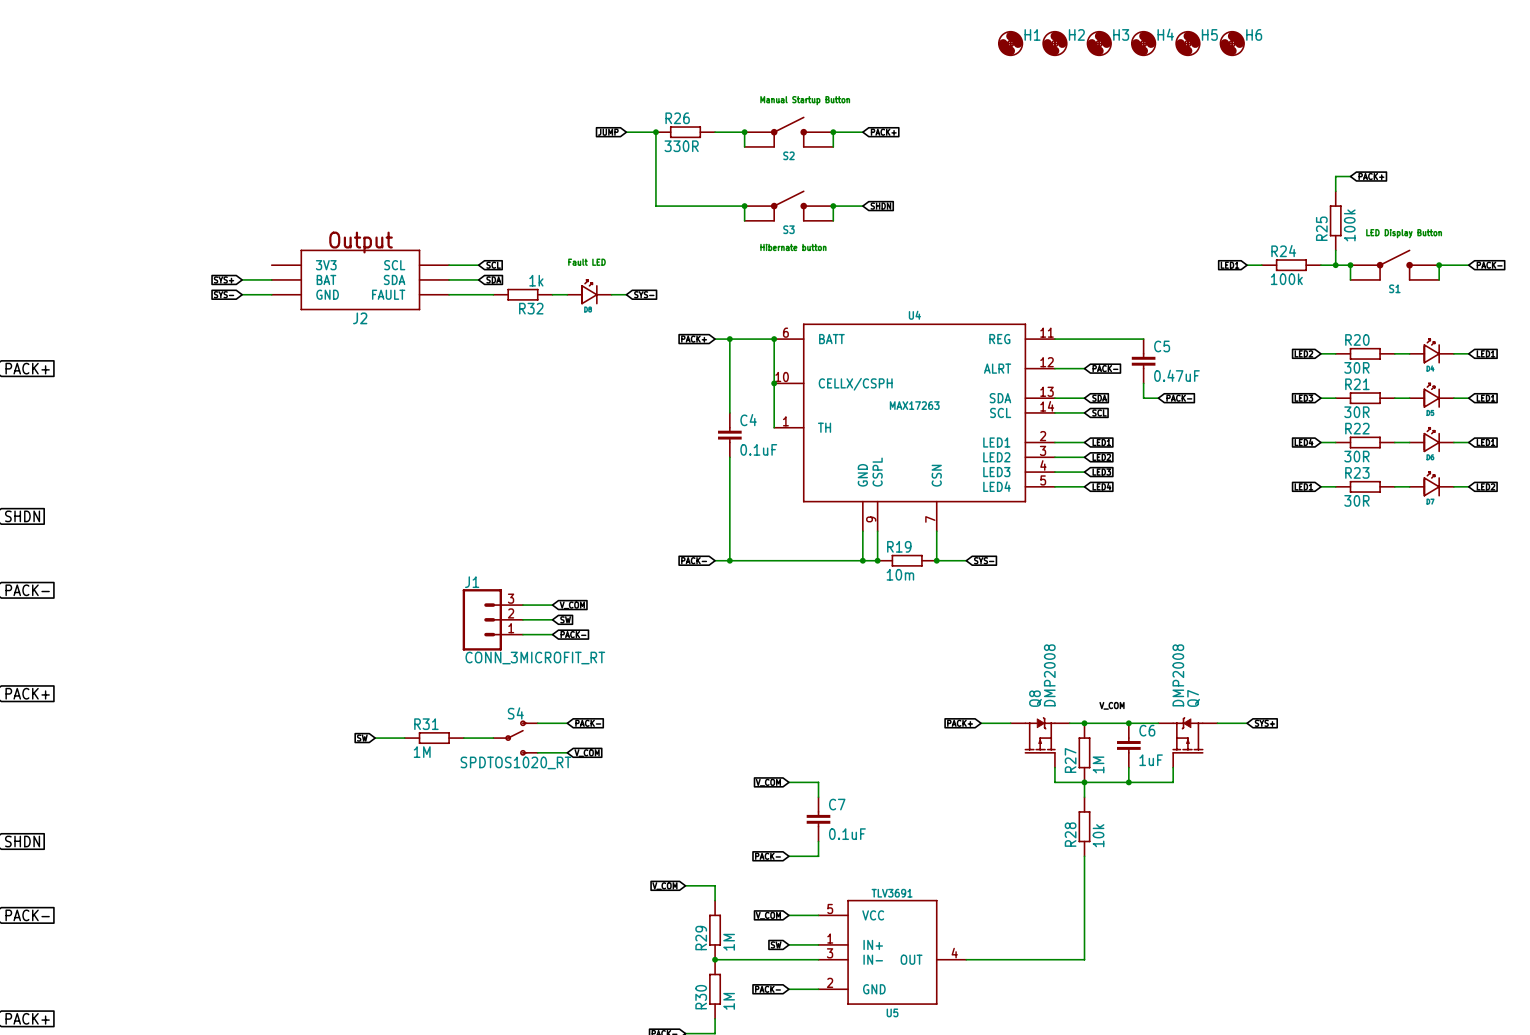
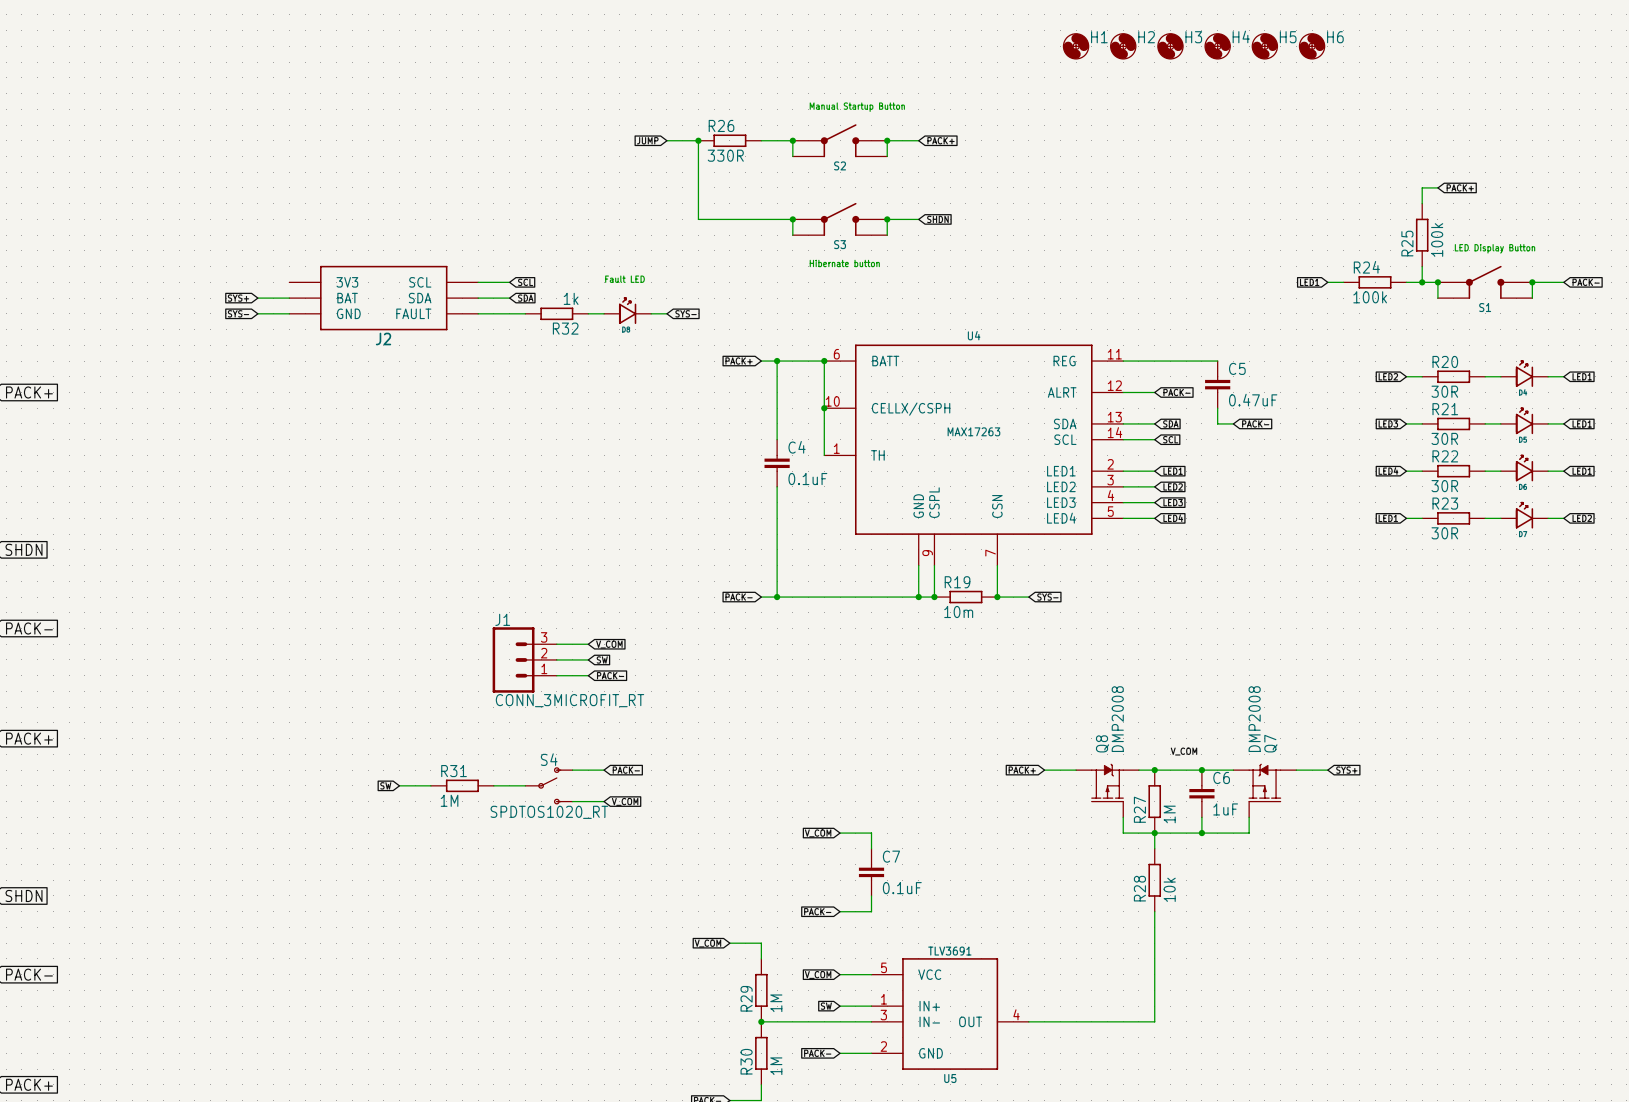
J2 text: Output (361, 242) -> none

